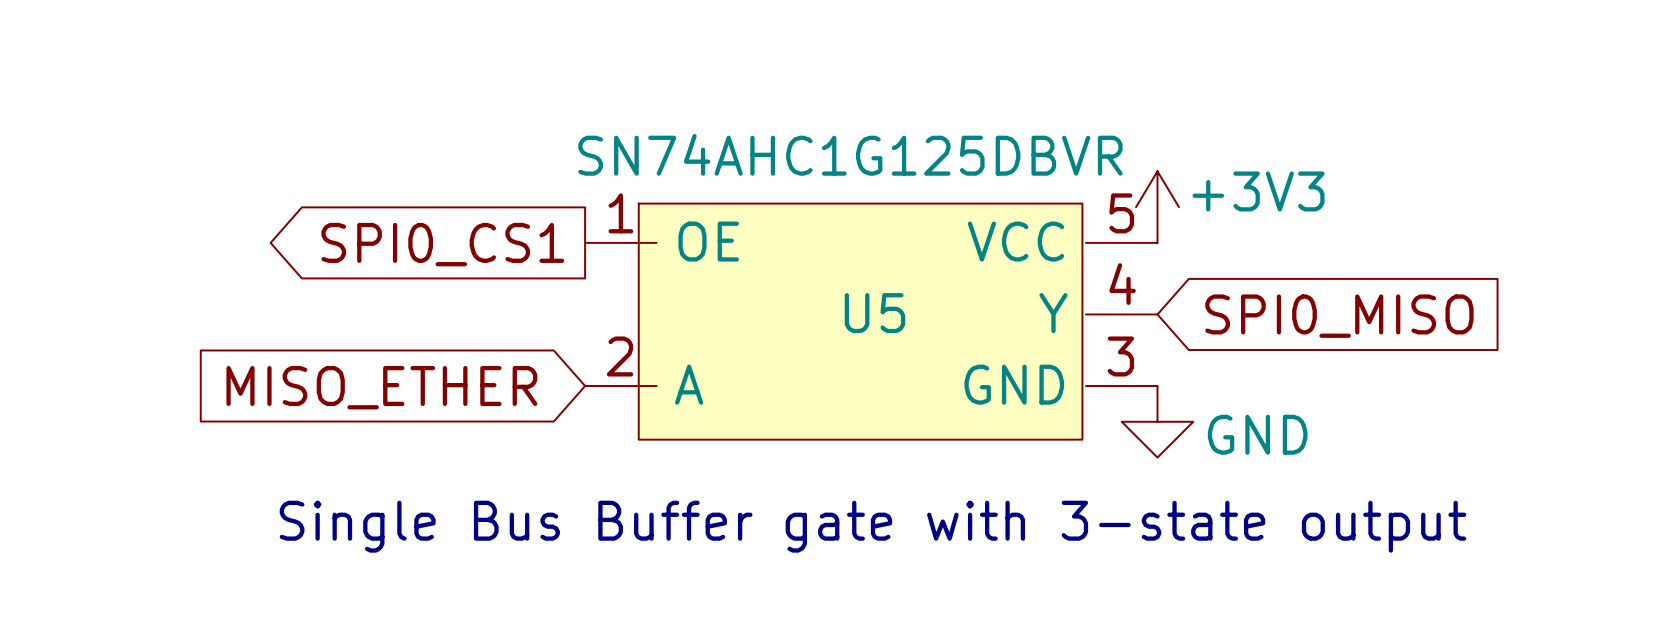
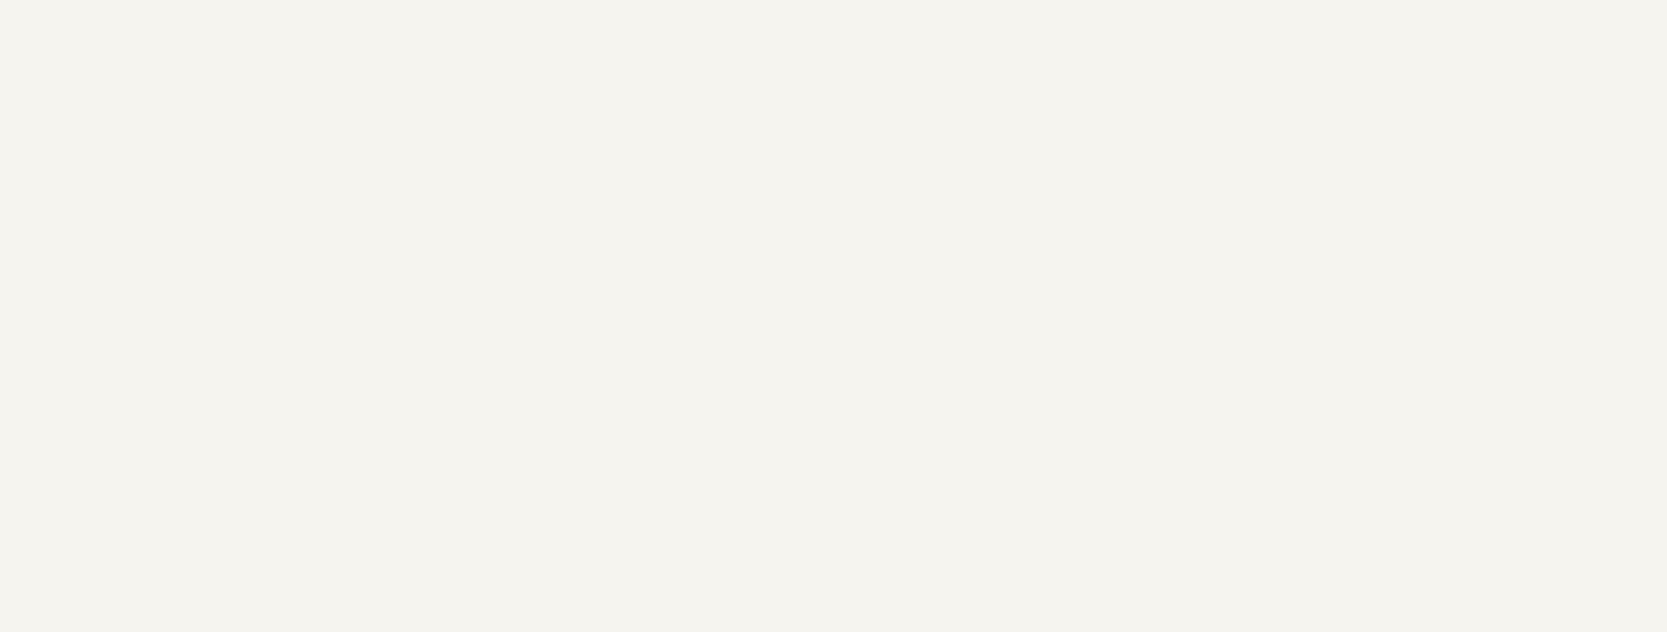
power symbol: +3V3 (1157, 207) -> none
global label: SPI0_CS1 (442, 244) -> none
global label: SPI0_MISO (1339, 316) -> none
U5: SN74AHC1G125DBVR (871, 321) -> none
global label: MISO_ETHER (381, 387) -> none
power symbol: GND (1157, 421) -> none
text: Single Bus Buffer gate with 3-state output (873, 526) -> none

